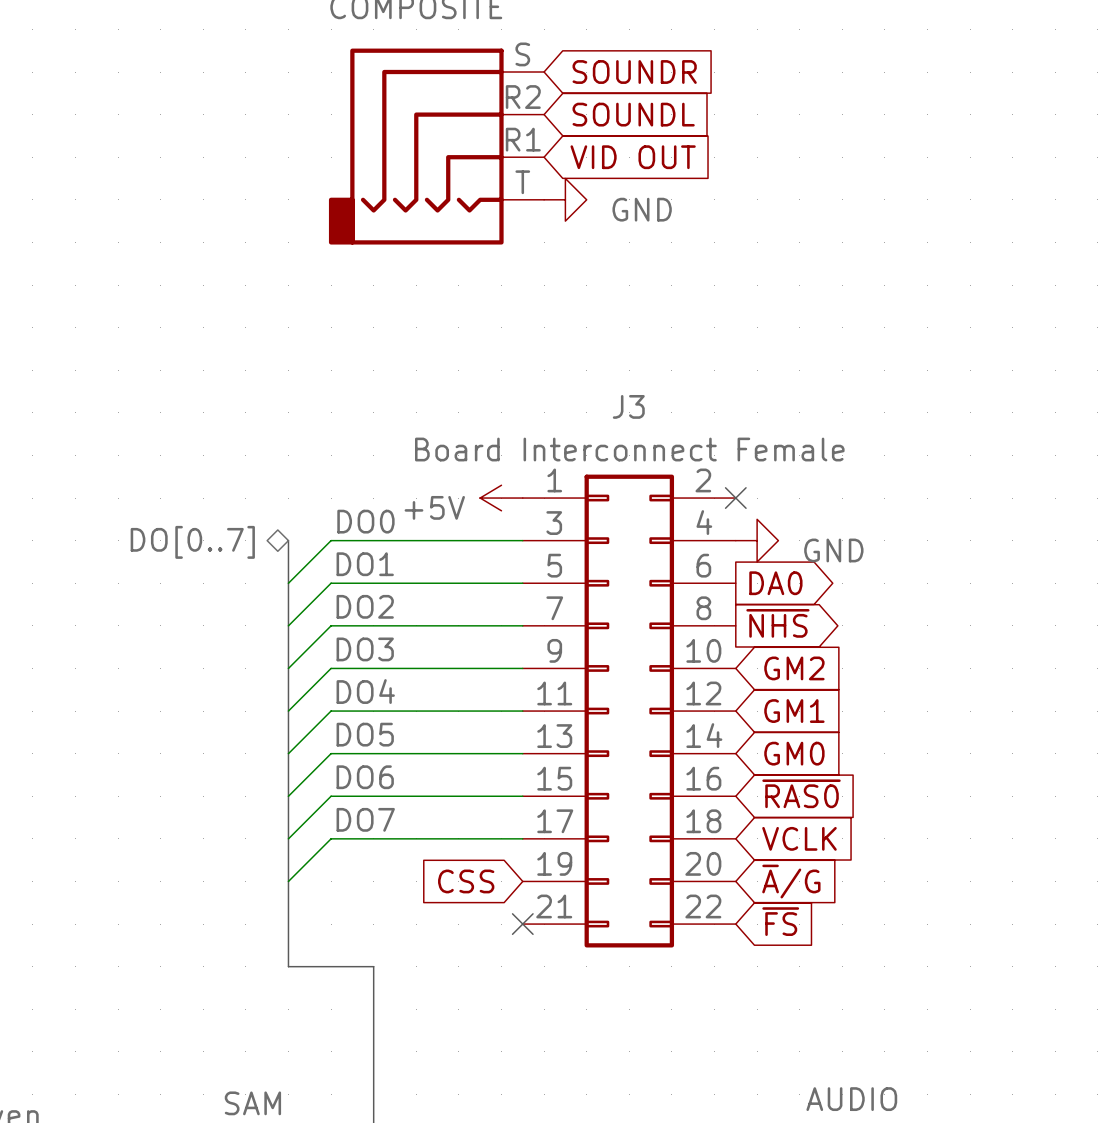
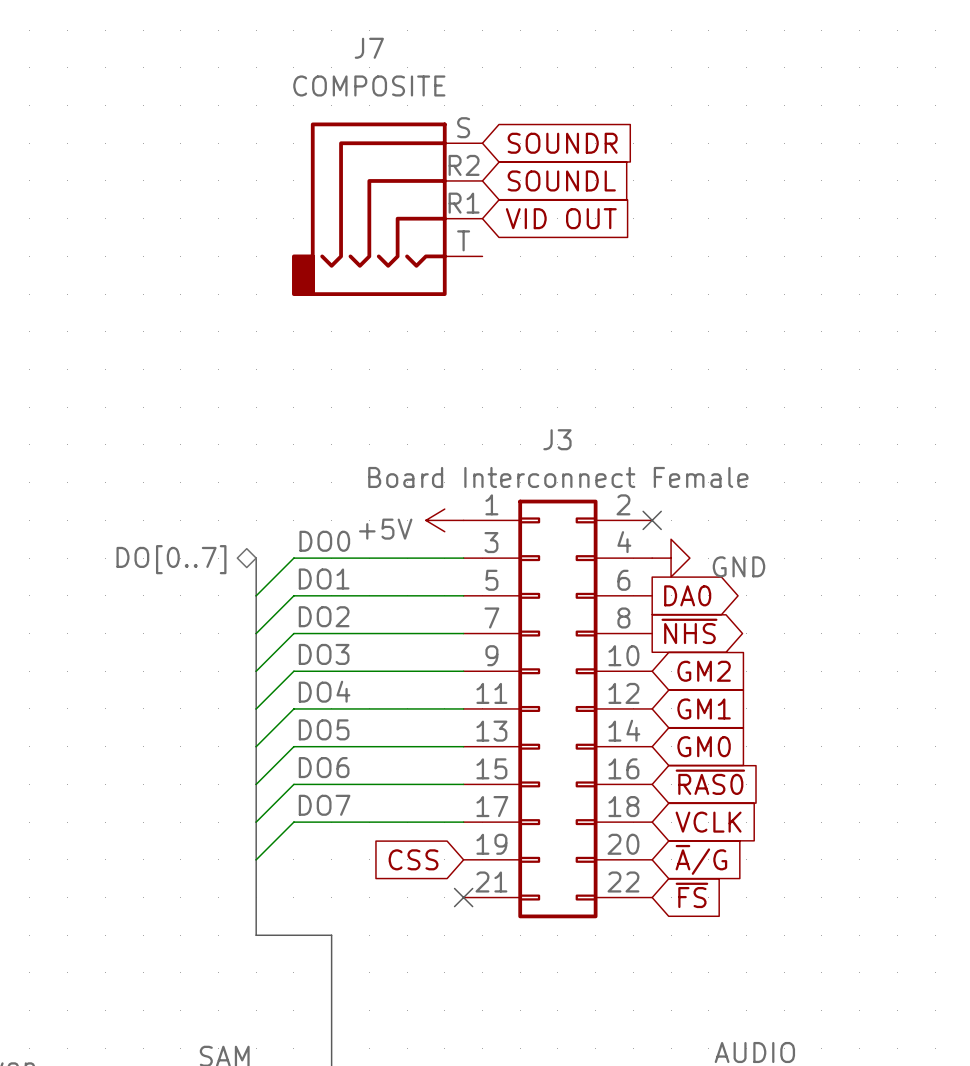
power symbol: GND (565, 199) -> none

